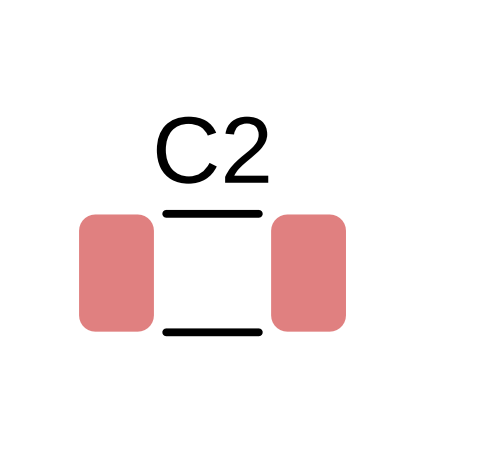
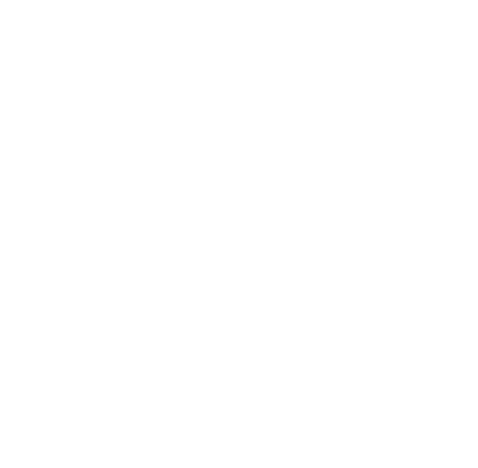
C2: (212, 273) -> none

